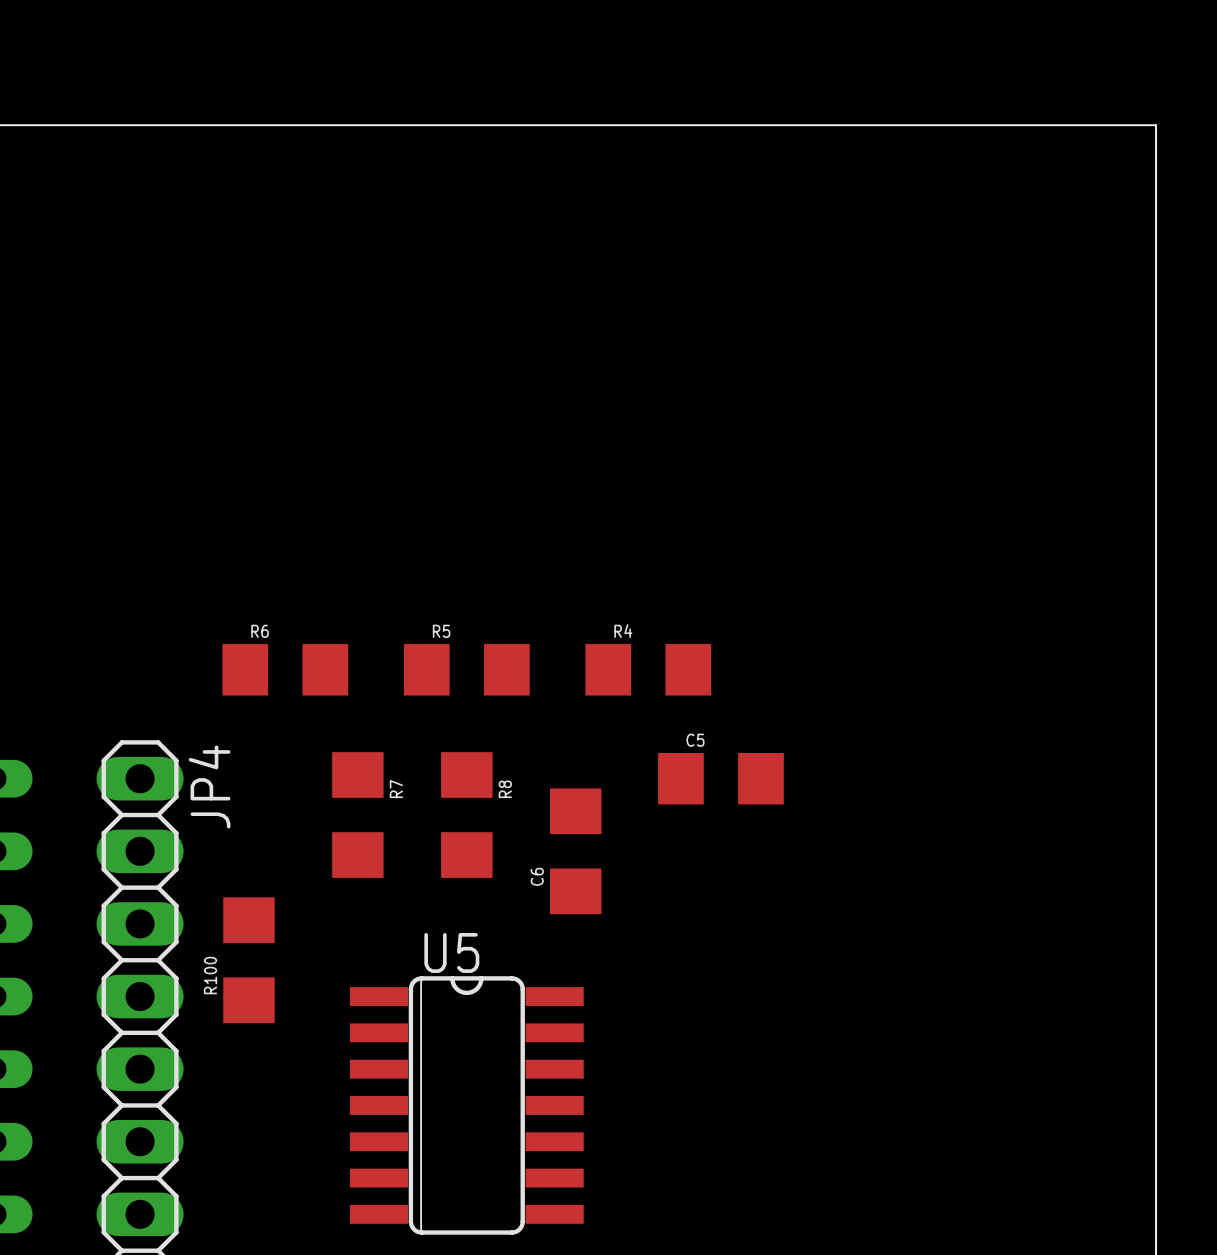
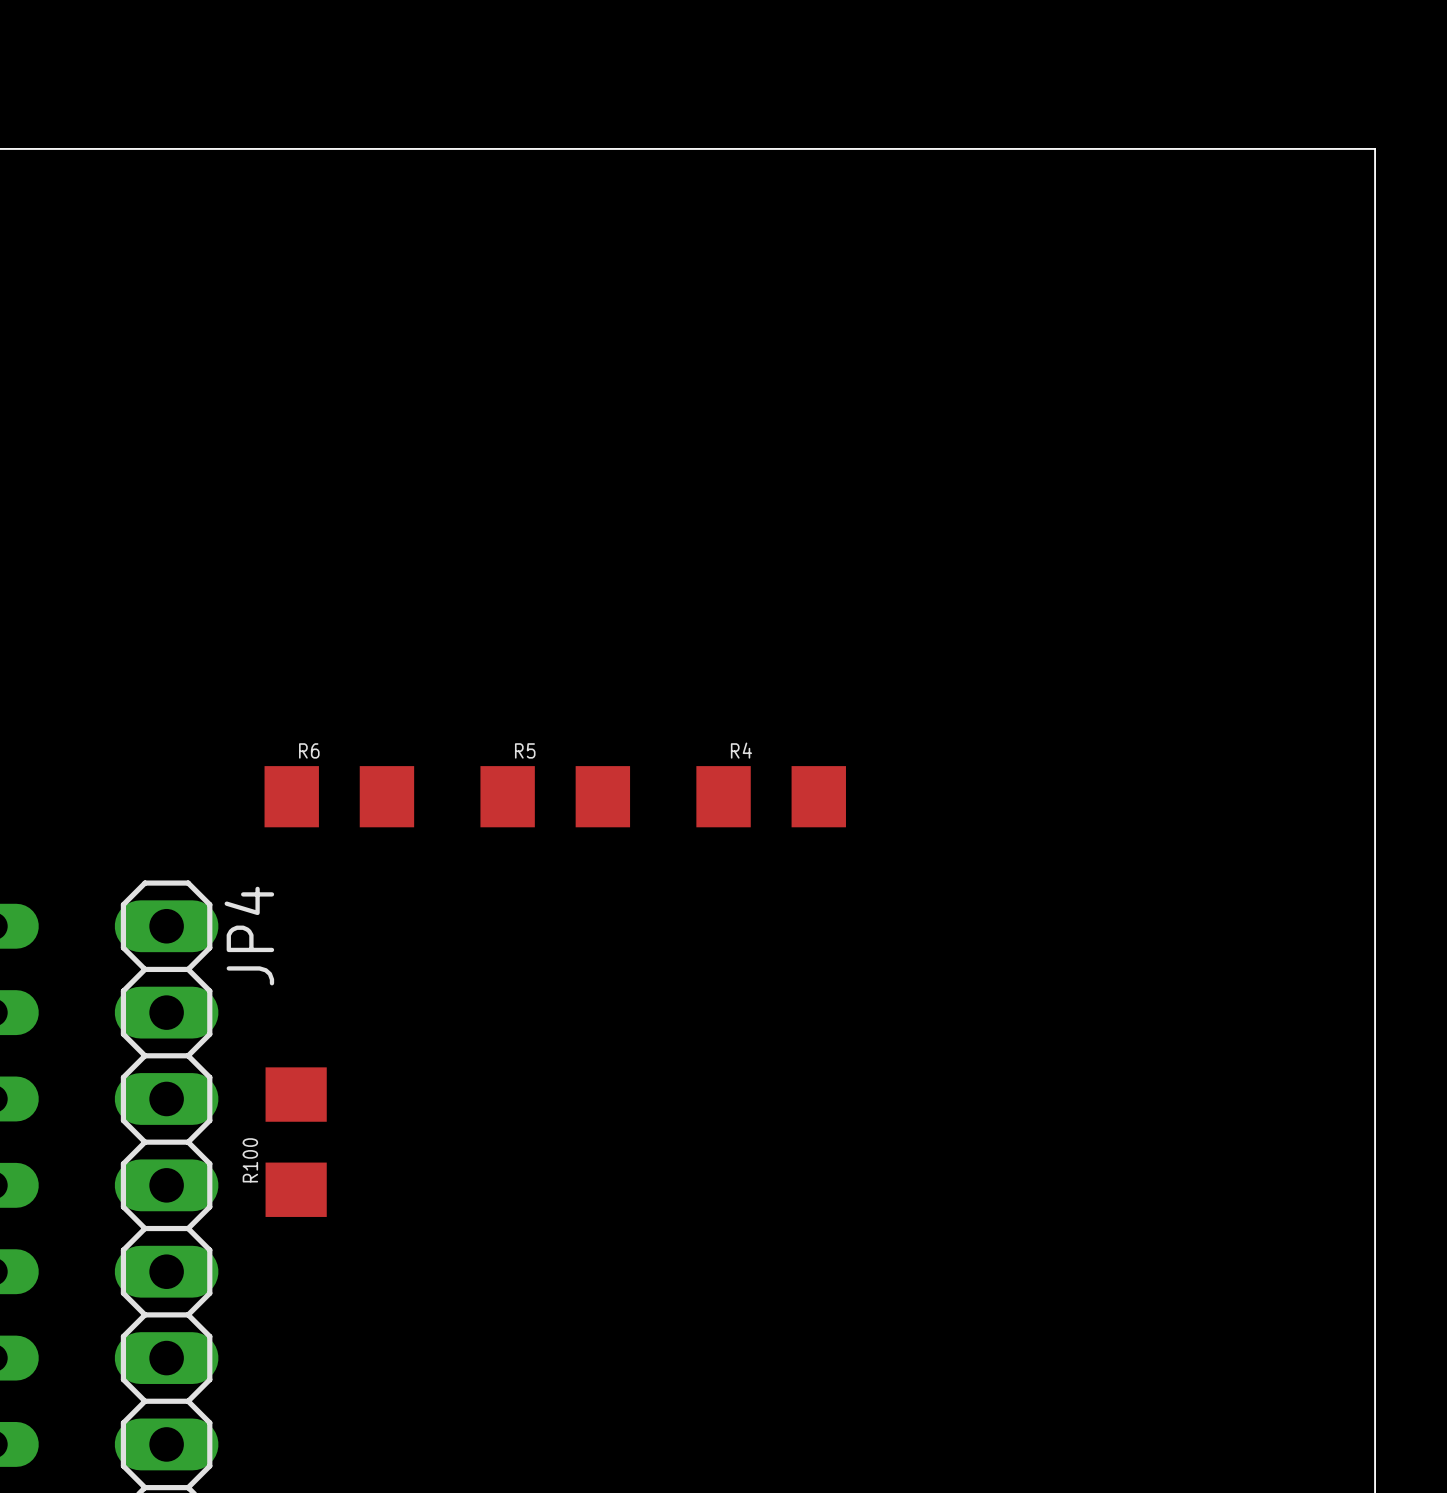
C5: (720, 778) -> none
R7: (357, 815) -> none
R8: (466, 815) -> none
C6: (575, 851) -> none
U5: (466, 1105) -> none

